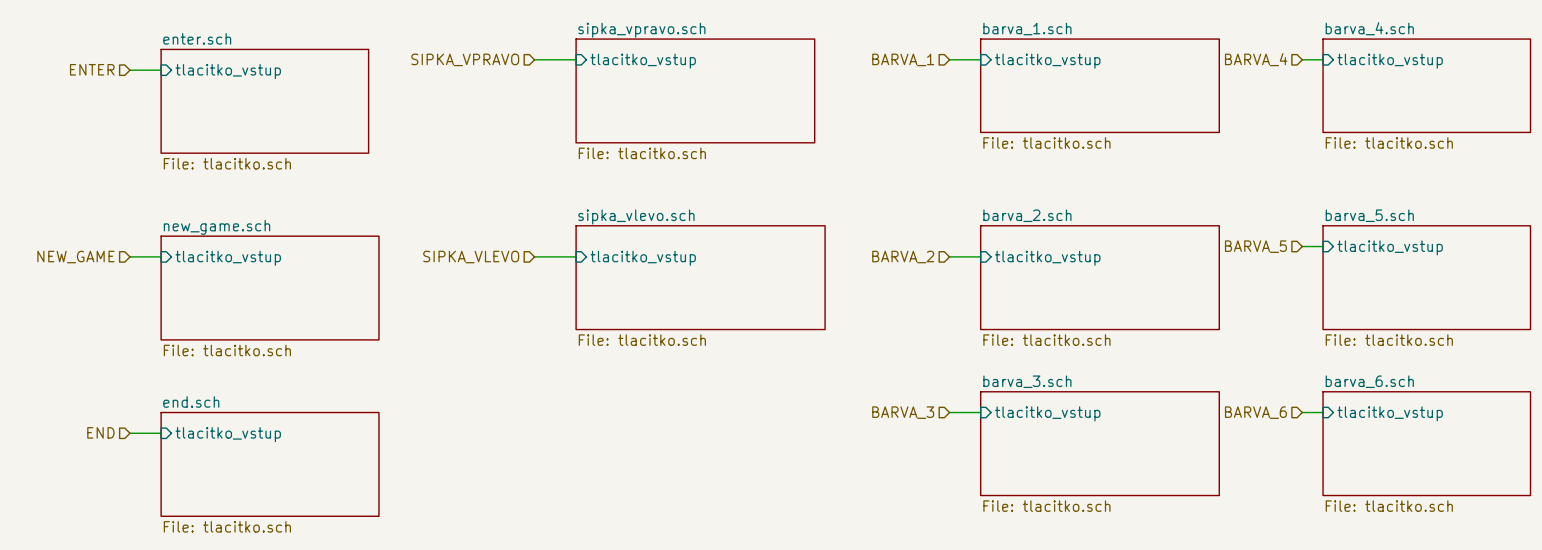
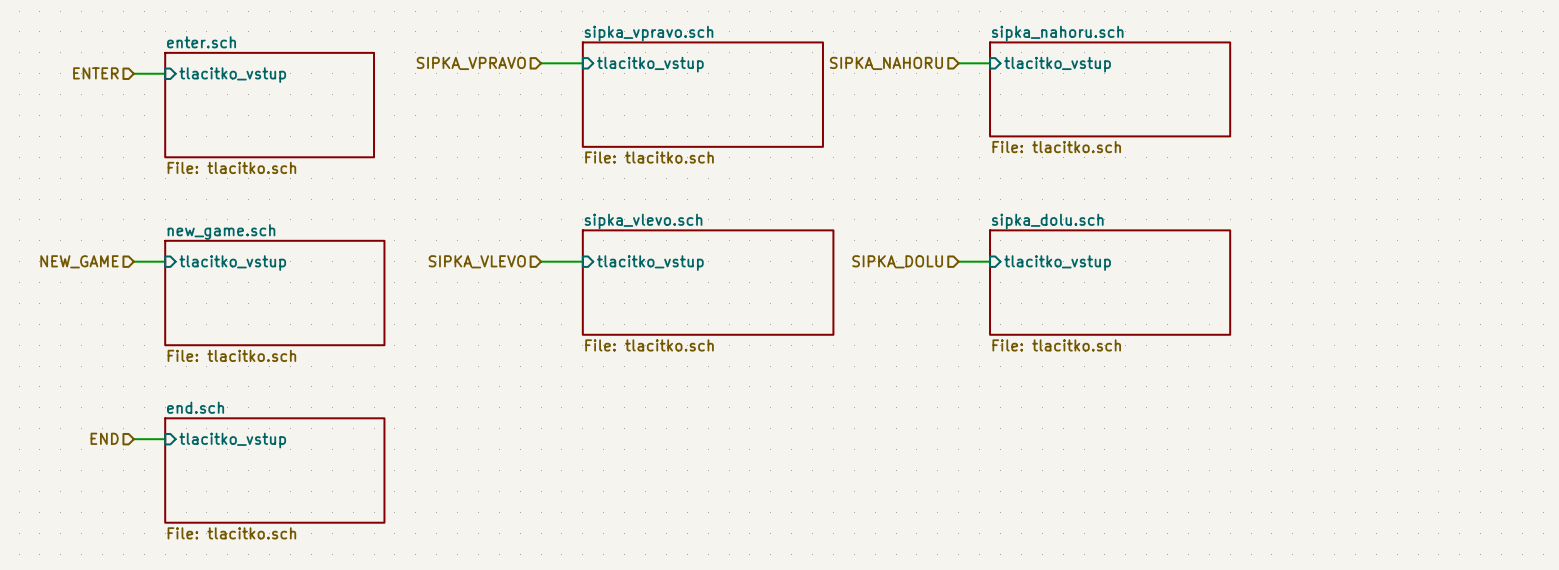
sheet barva_1.sch name: barva_1.sch (1027, 29) -> sipka_nahoru.sch (1057, 33)
hierarchical label: BARVA_1 (903, 59) -> SIPKA_NAHORU (886, 63)
hierarchical label: BARVA_4 (1256, 59) -> none
wire: (1302, 59) (1323, 59) -> none
sheet pin: tlacitko_vstup (1390, 61) -> none
sheet barva_4.sch: File: tlacitko.sch (1426, 85) -> none
sheet barva_2.sch name: barva_2.sch (1027, 215) -> sipka_dolu.sch (1047, 221)
hierarchical label: BARVA_5 (1255, 246) -> none
wire: (1302, 246) (1323, 246) -> none
sheet pin: tlacitko_vstup (1390, 247) -> none
hierarchical label: BARVA_2 (903, 257) -> SIPKA_DOLU (897, 261)
sheet barva_5.sch: File: tlacitko.sch (1426, 277) -> none
hierarchical label: BARVA_3 (903, 412) -> none
wire: (949, 412) (980, 412) -> none
hierarchical label: BARVA_6 (1255, 412) -> none
wire: (1302, 412) (1323, 412) -> none
sheet pin: tlacitko_vstup (1047, 413) -> none
sheet pin: tlacitko_vstup (1390, 413) -> none
sheet barva_3.sch: File: tlacitko.sch (1099, 443) -> none
sheet barva_6.sch: File: tlacitko.sch (1426, 443) -> none

